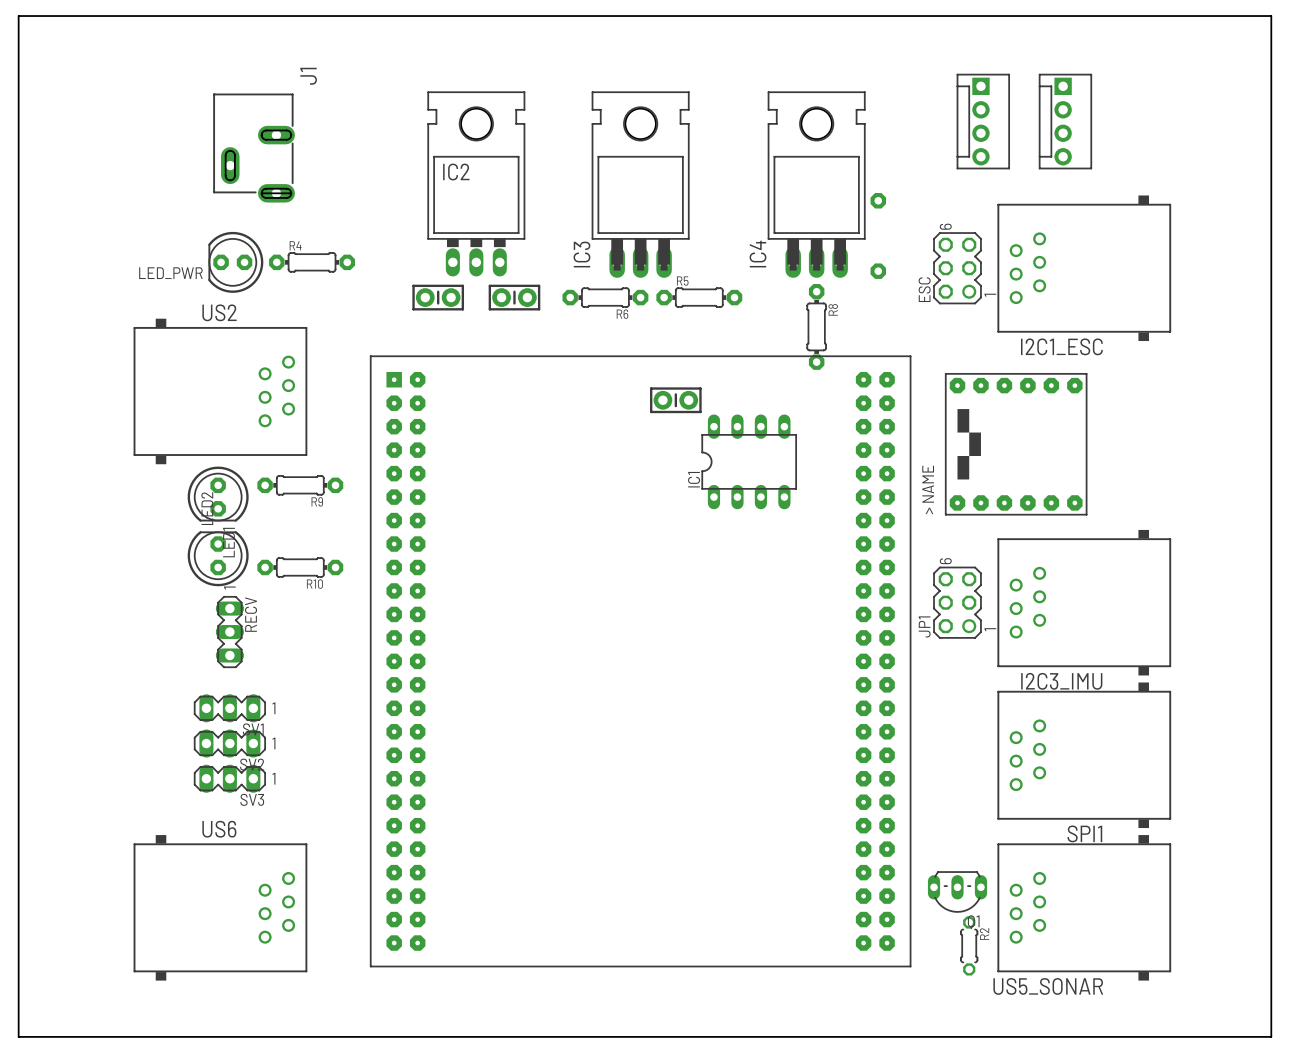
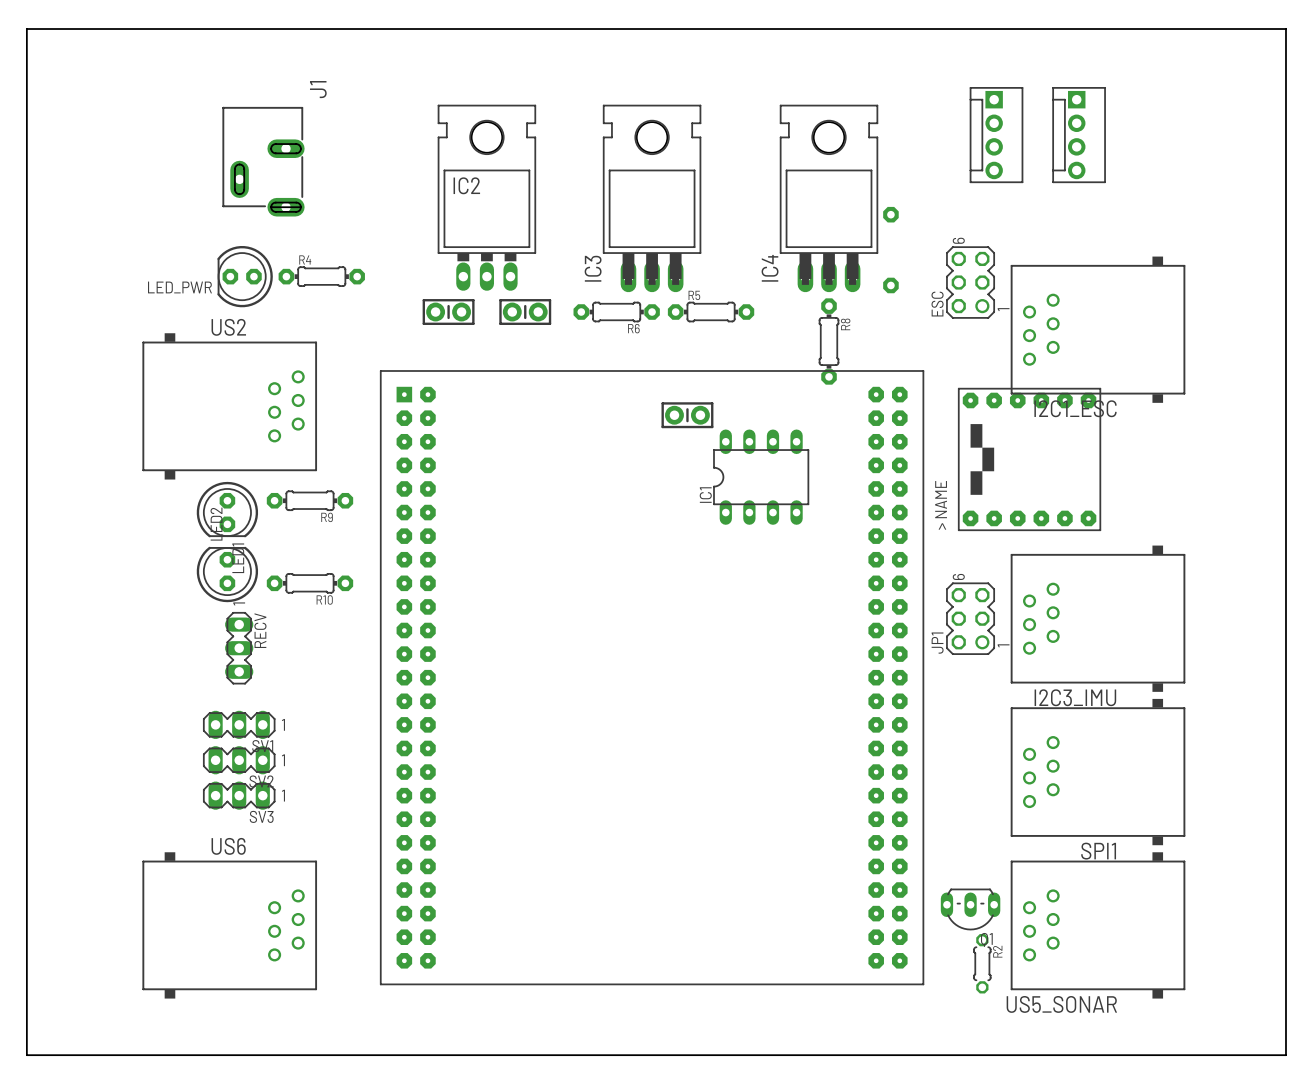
I2C1_ESC position: (1084, 268) -> (1098, 329)

